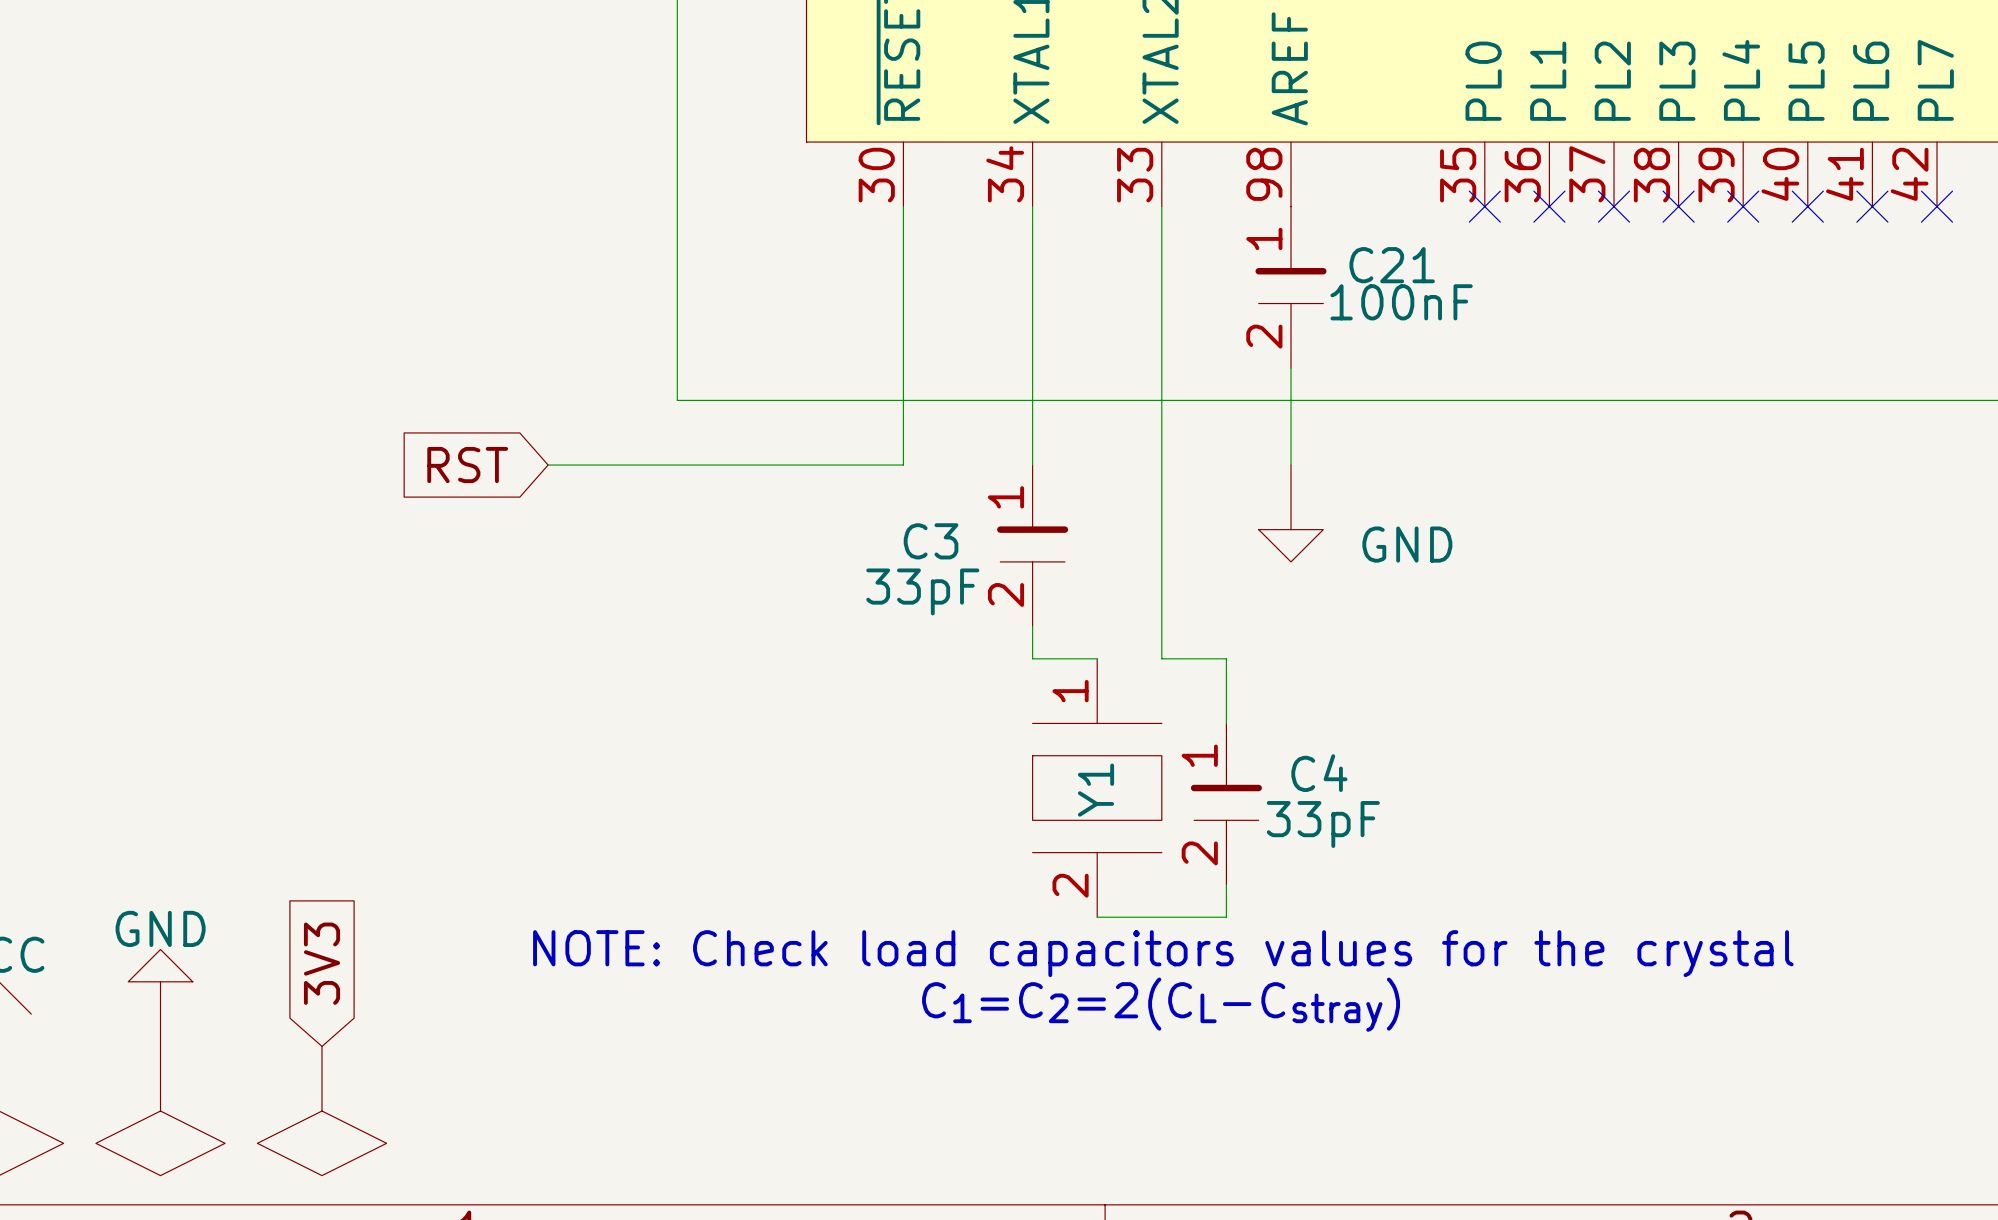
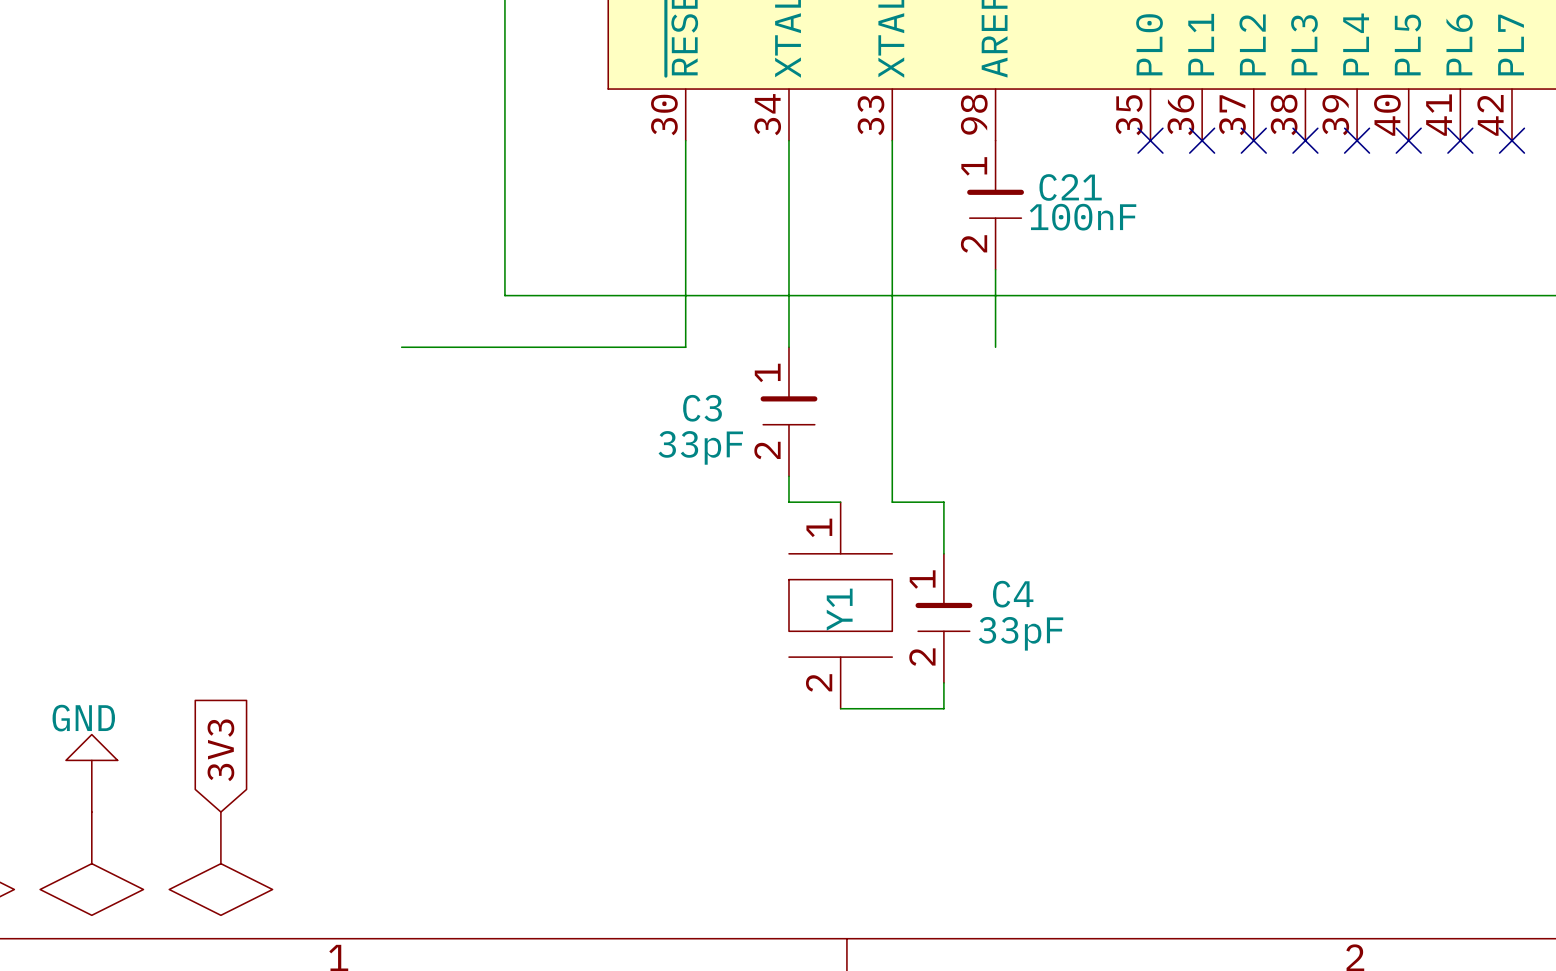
global label: RST (467, 465) -> none
power symbol: GND (1291, 513) -> none
text: NOTE: Check load capacitors values for the crystal (1163, 953) -> none
text: C1=C2=2(CL-Cstray) (1161, 1004) -> none

